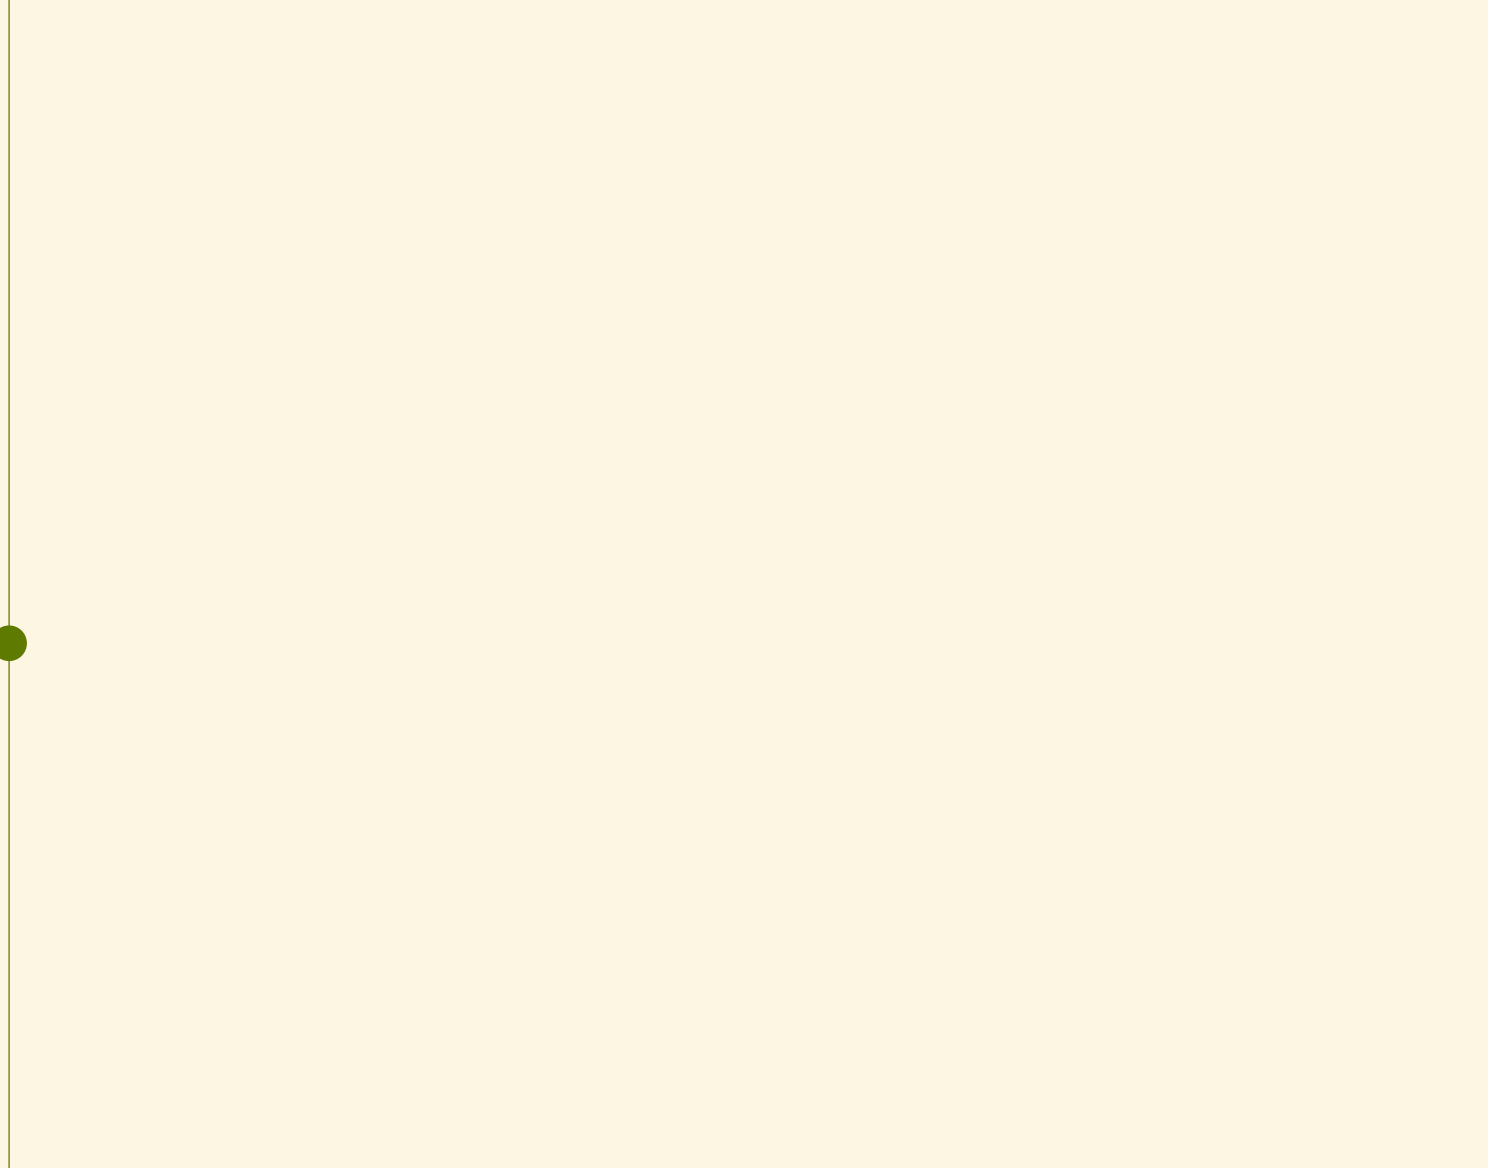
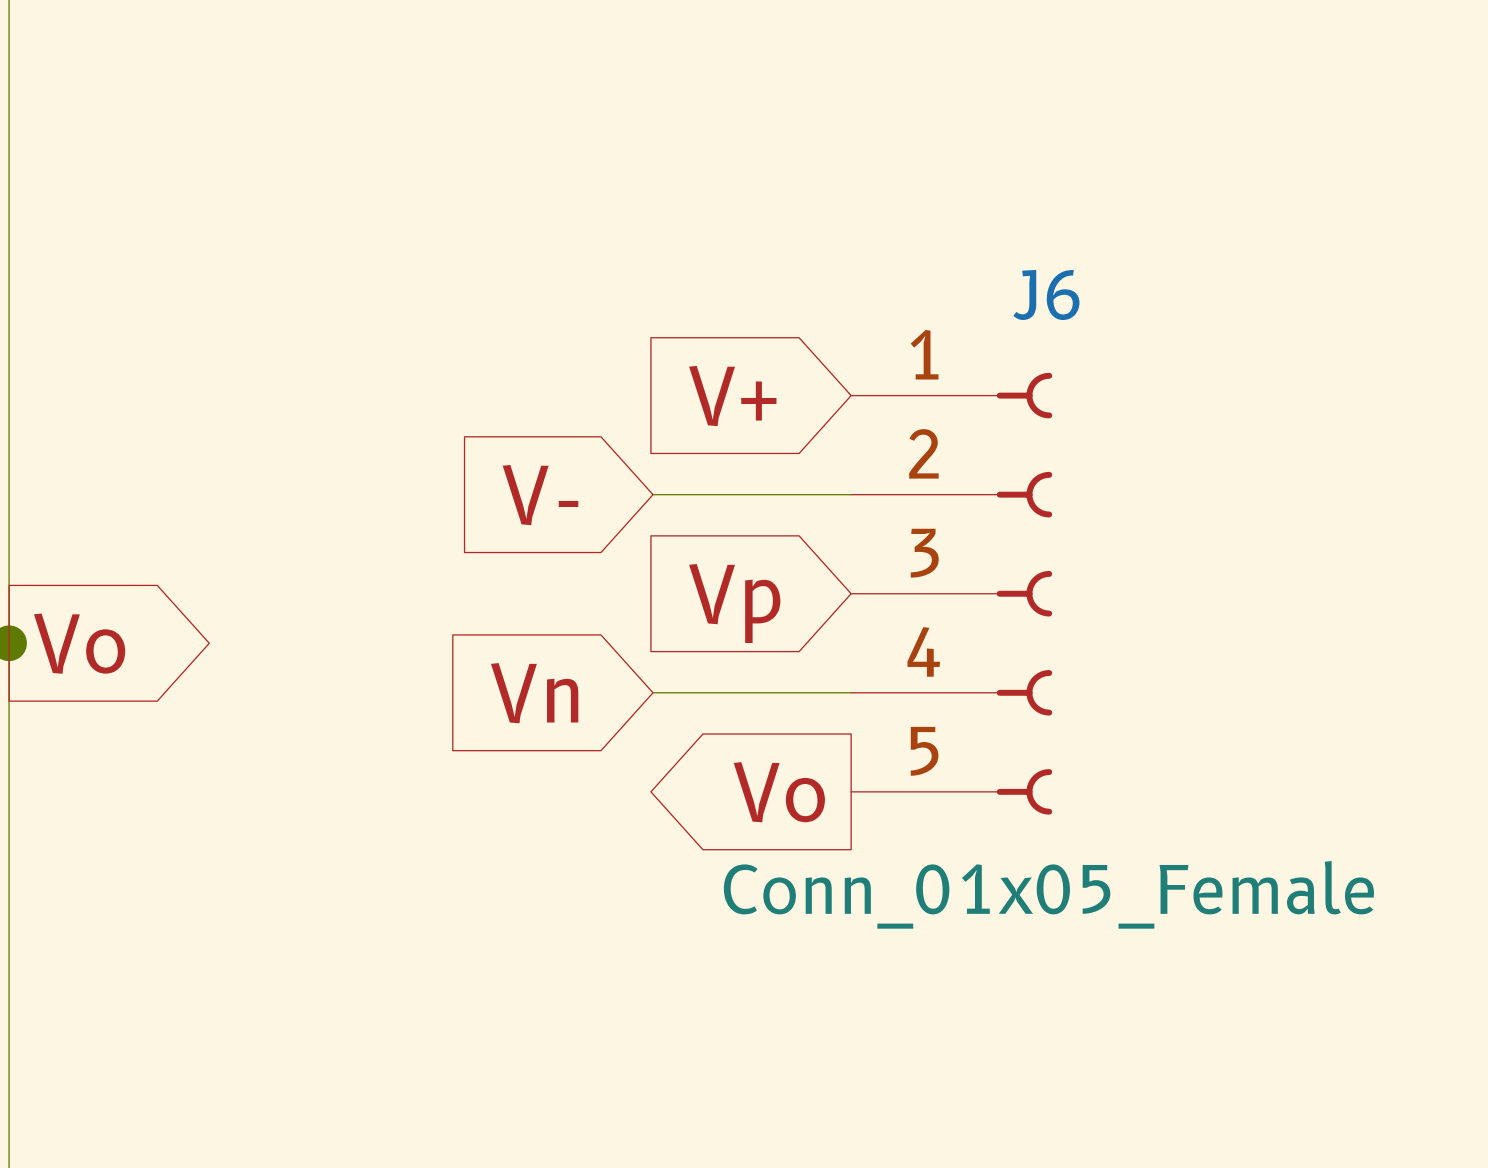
global label: none -> V+ (732, 396)
global label: none -> V- (540, 495)
wire: none -> (653, 494) (851, 494)
J6: none -> Conn_01x05_Female (951, 593)
global label: none -> Vp (734, 603)
global label: none -> Vo (79, 643)
global label: none -> Vn (534, 693)
wire: none -> (653, 692) (851, 692)
global label: none -> Vo (779, 792)

